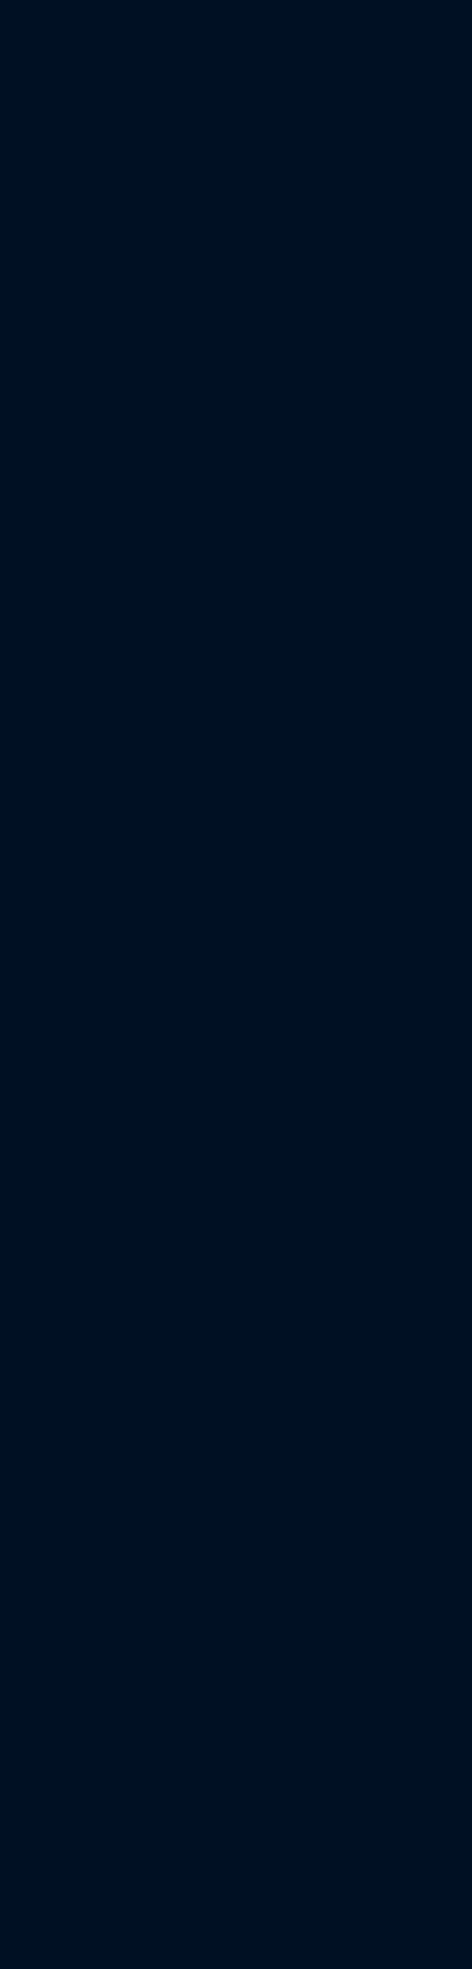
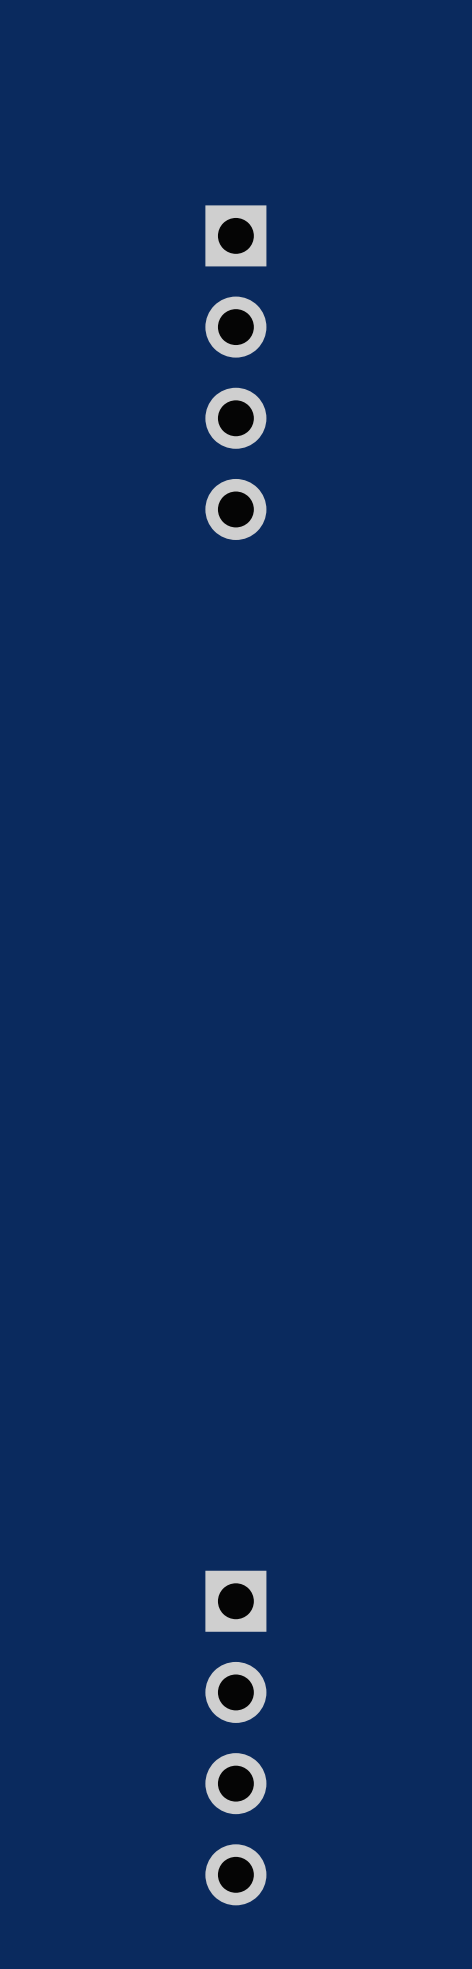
part: none -> (235, 372)
part: none -> (235, 1738)

